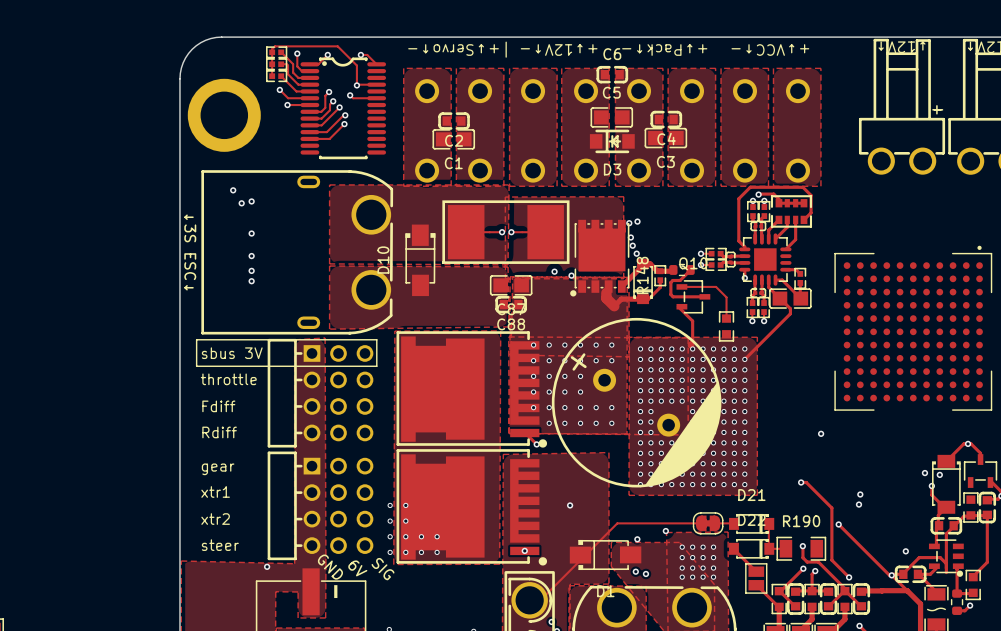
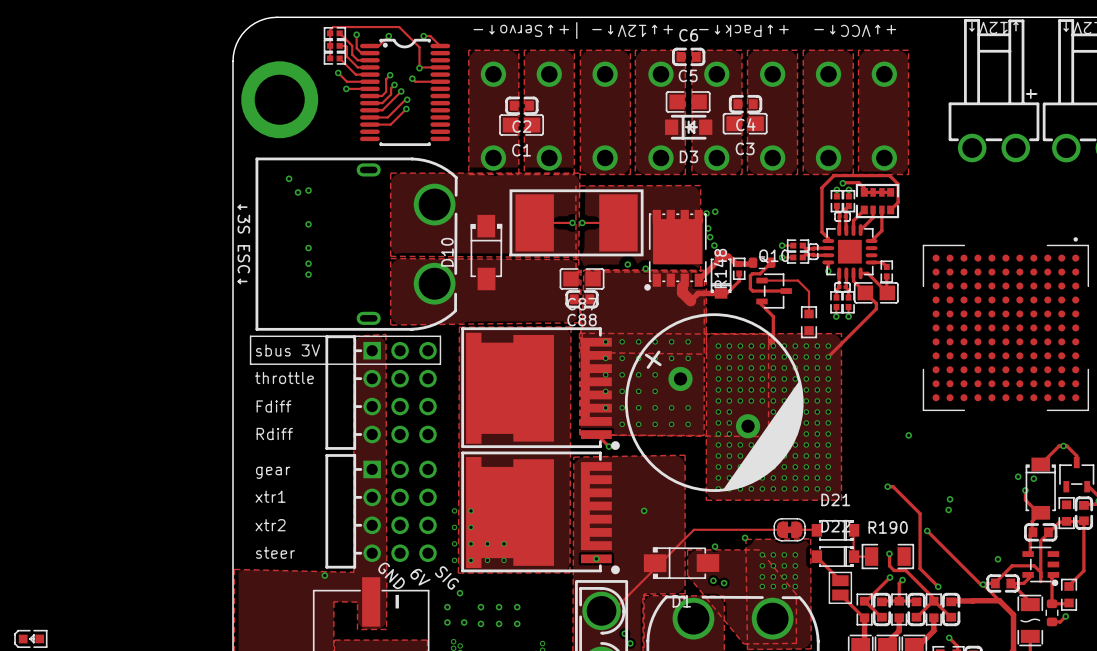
via: none -> (459, 593)
via: none -> (447, 607)
via: none -> (480, 607)
via: none -> (499, 607)
via: none -> (517, 607)
via: none -> (447, 622)
via: none -> (464, 622)
via: none -> (480, 623)
via: none -> (499, 623)
via: none -> (517, 623)

